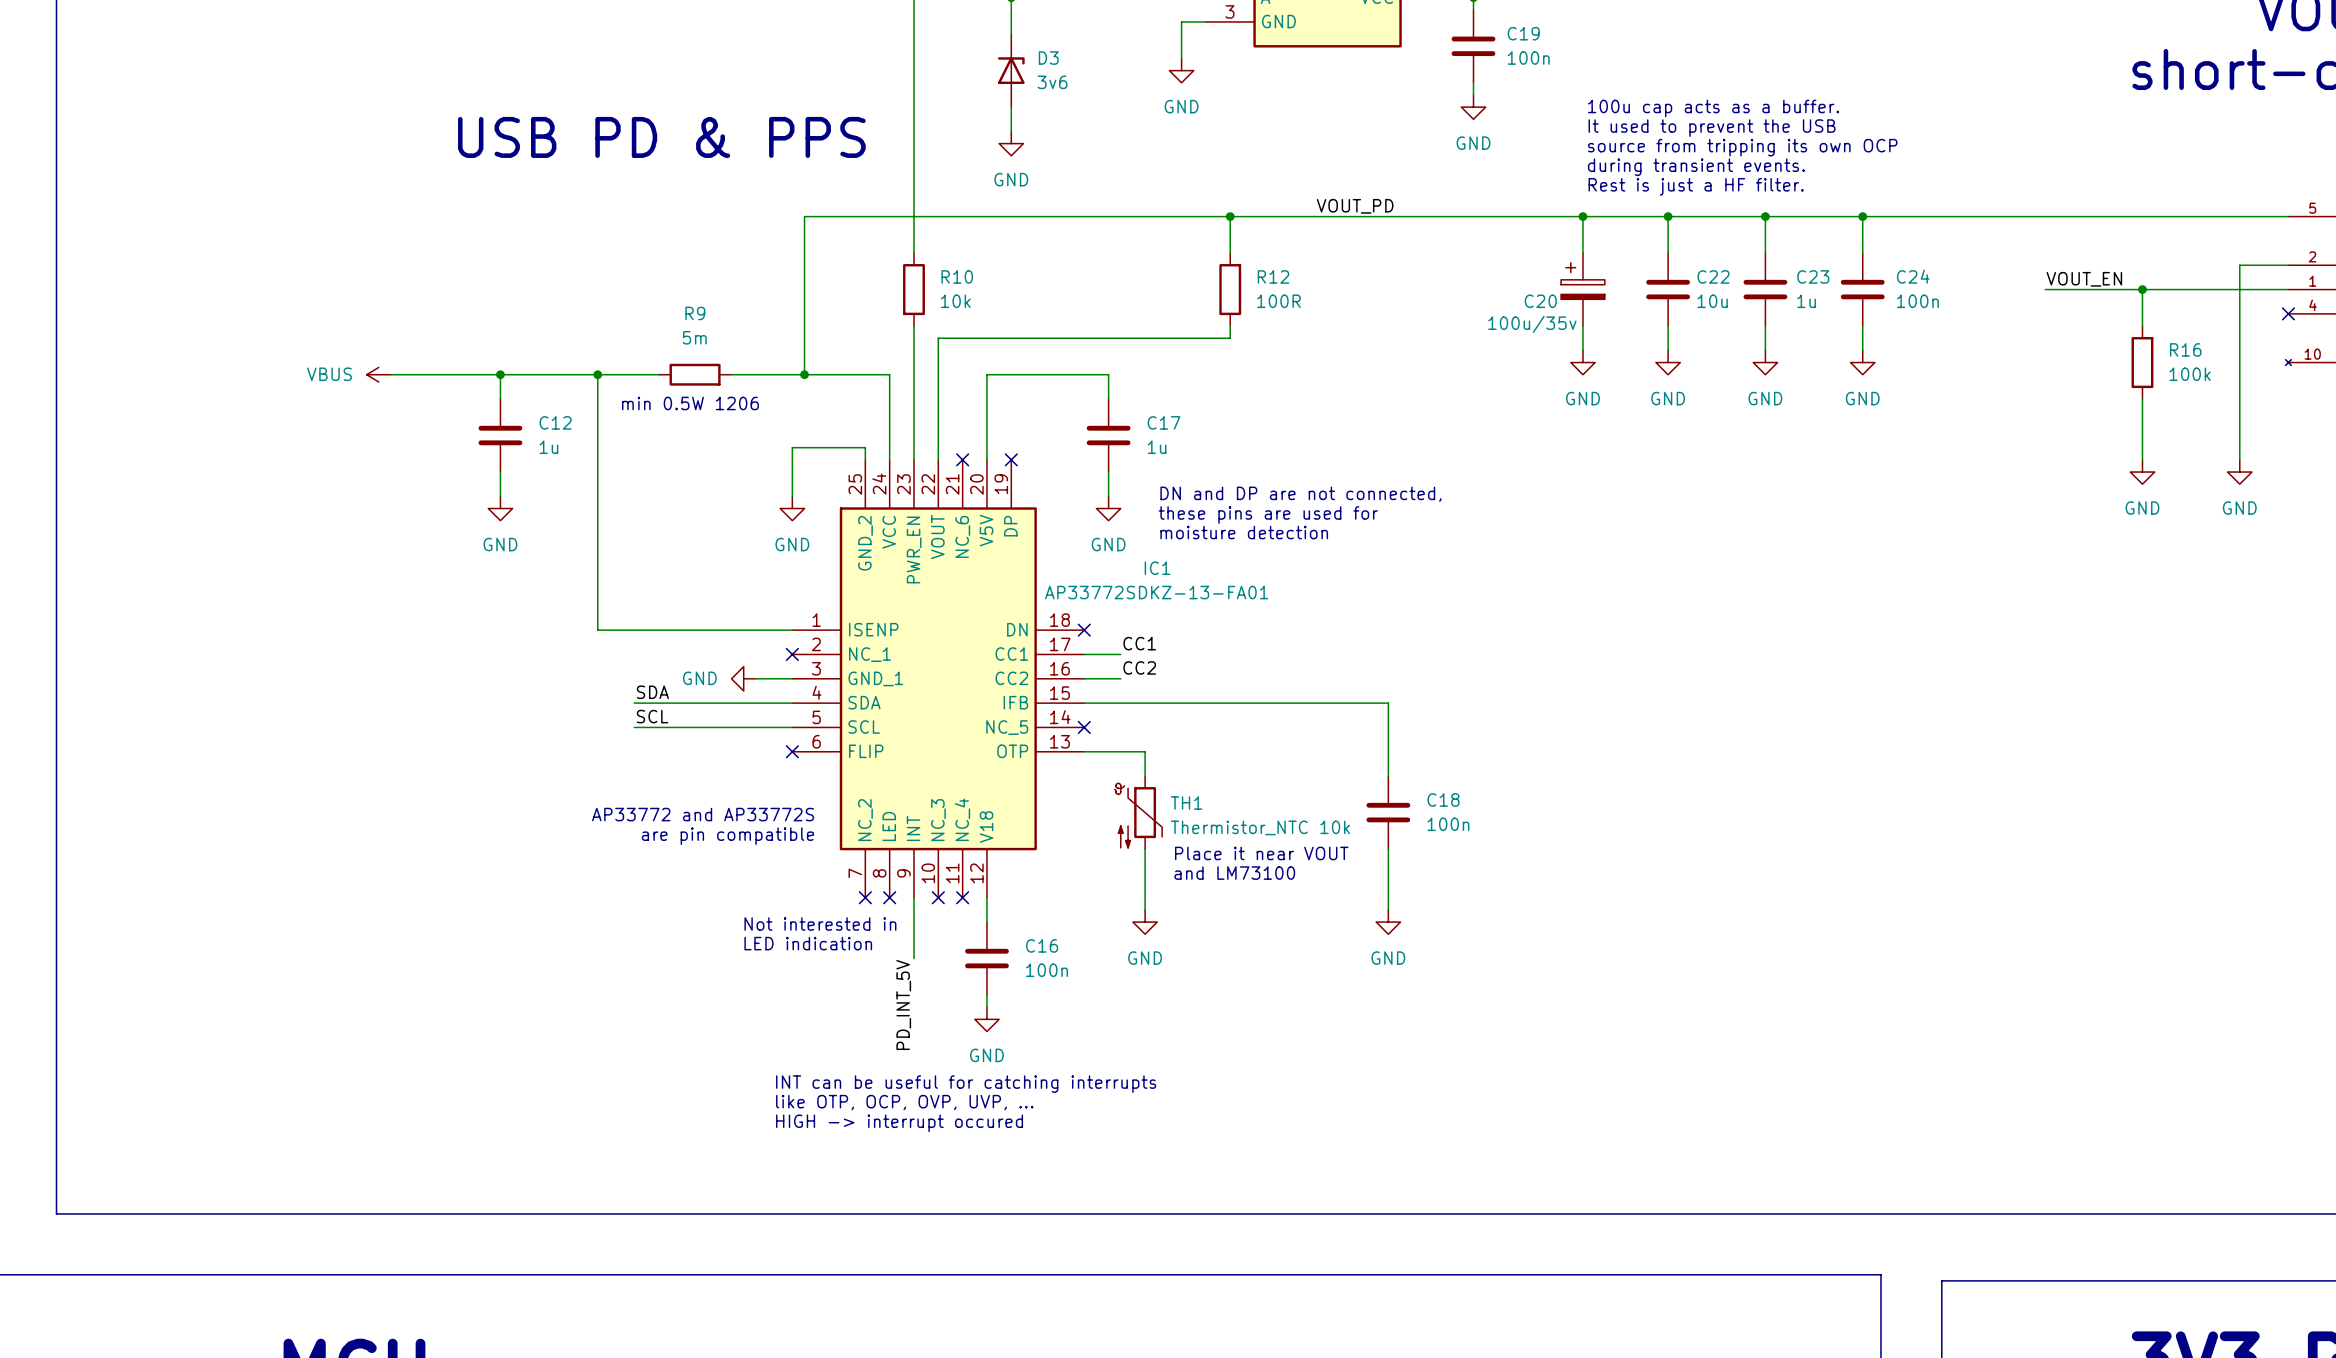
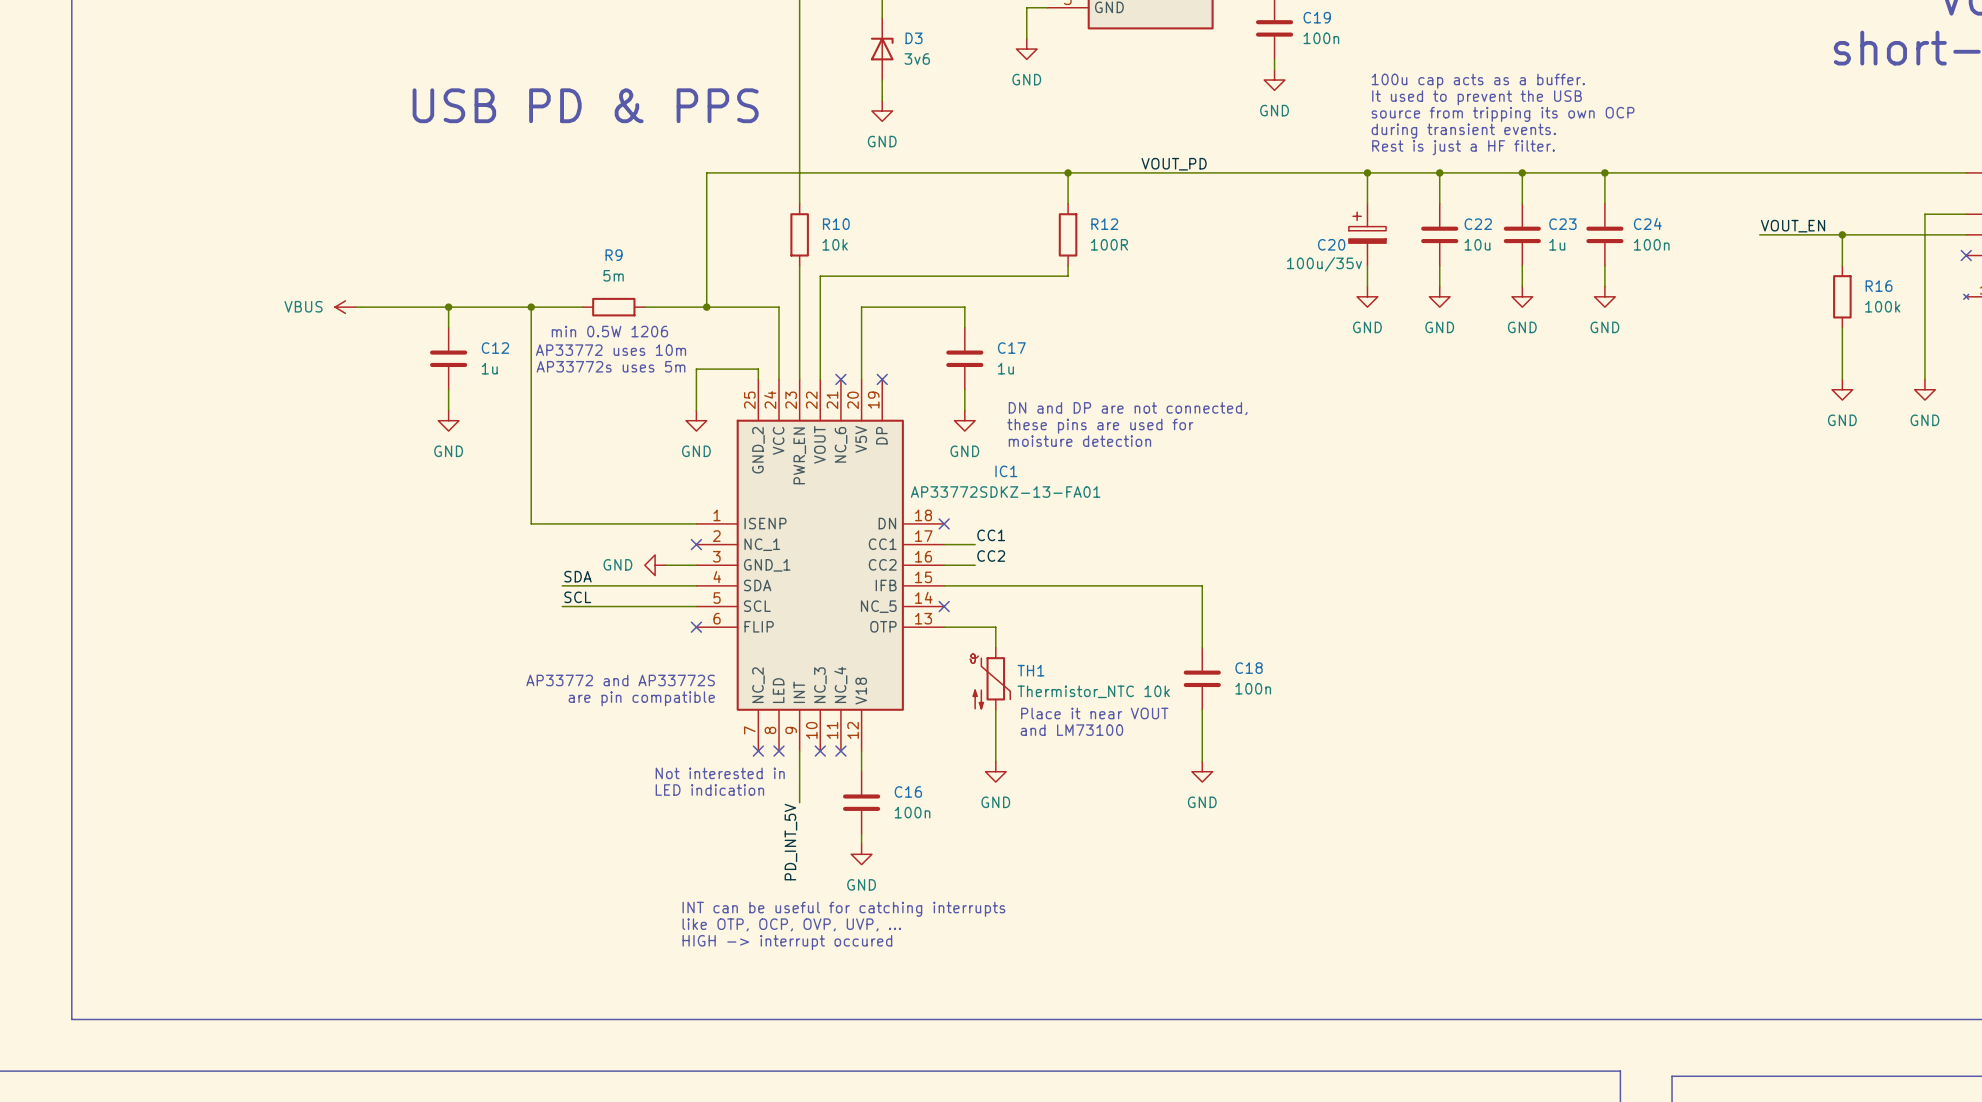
text: none -> AP33772 uses 10m (611, 350)
text: none -> AP33772s uses 5m (611, 366)

